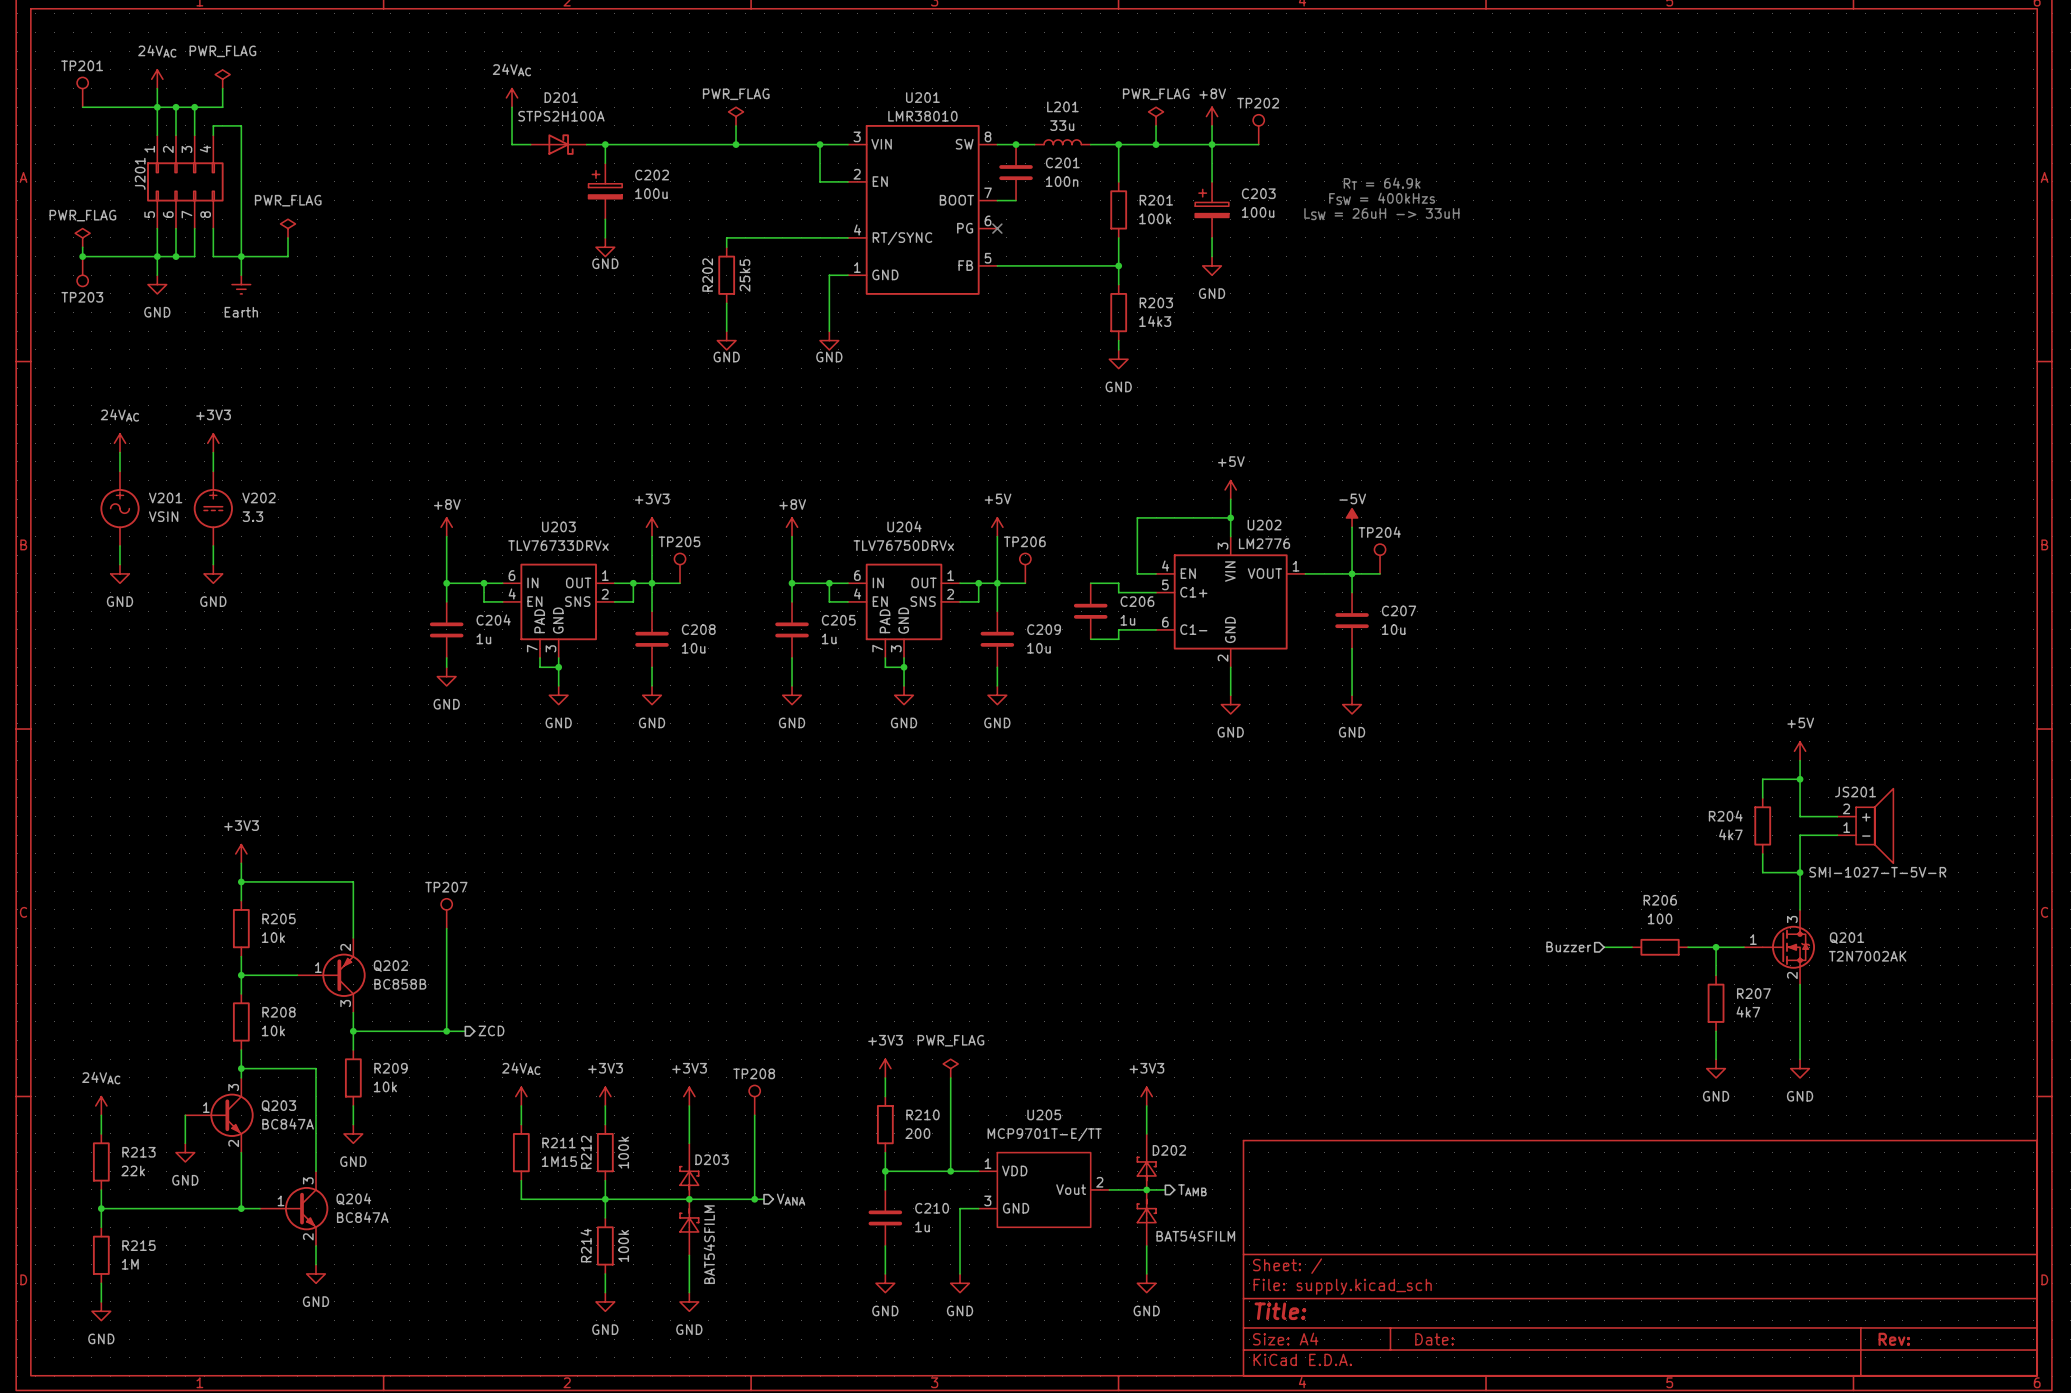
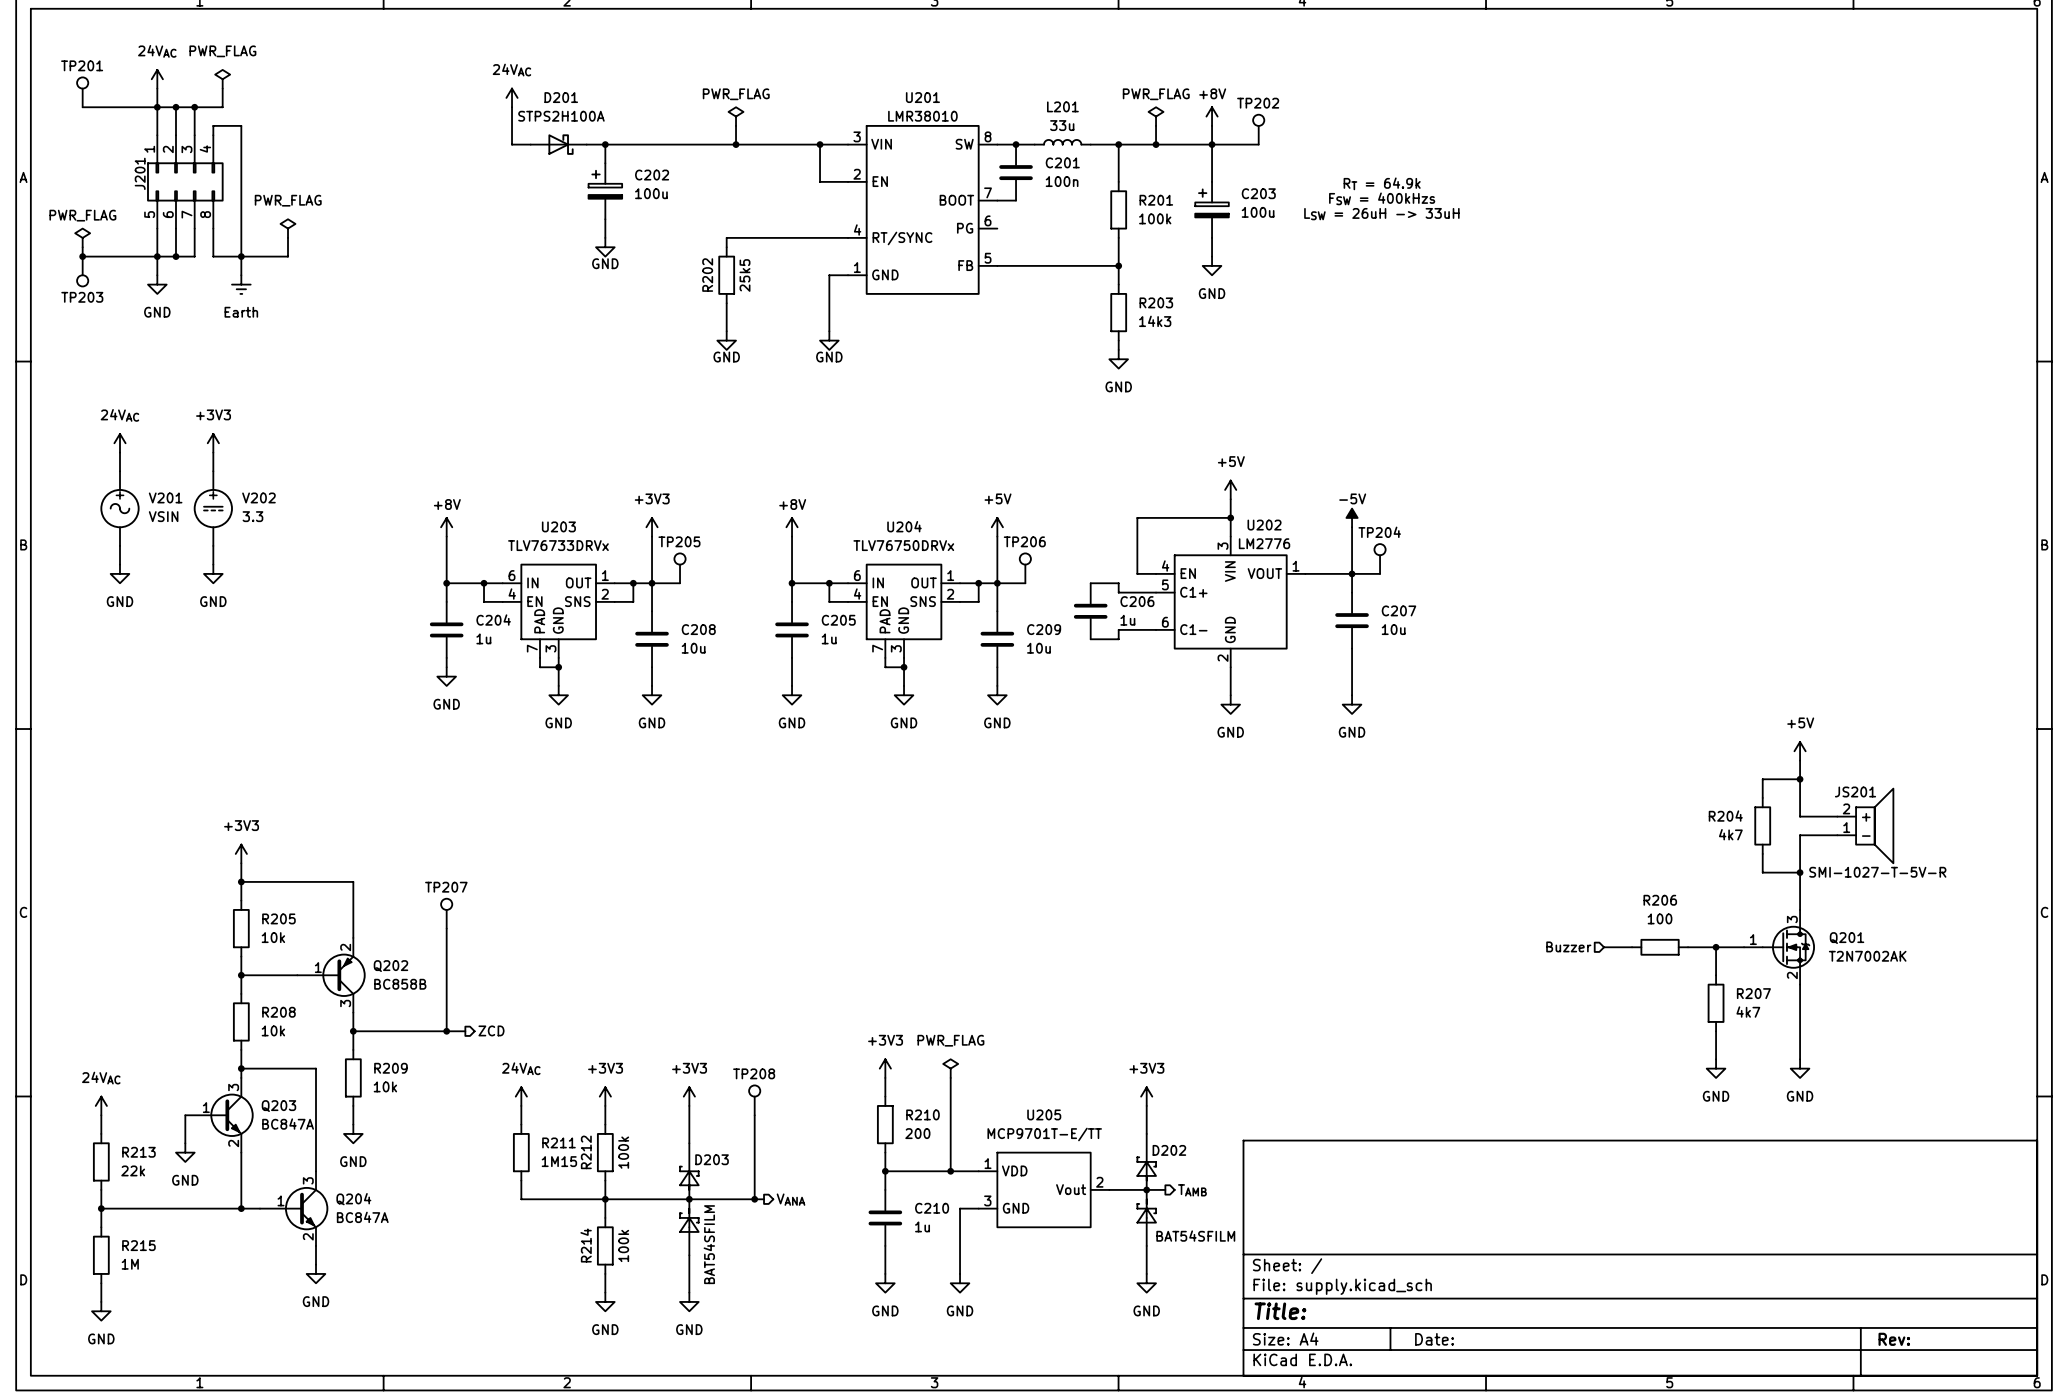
no-connect mark: (997, 228) -> none

